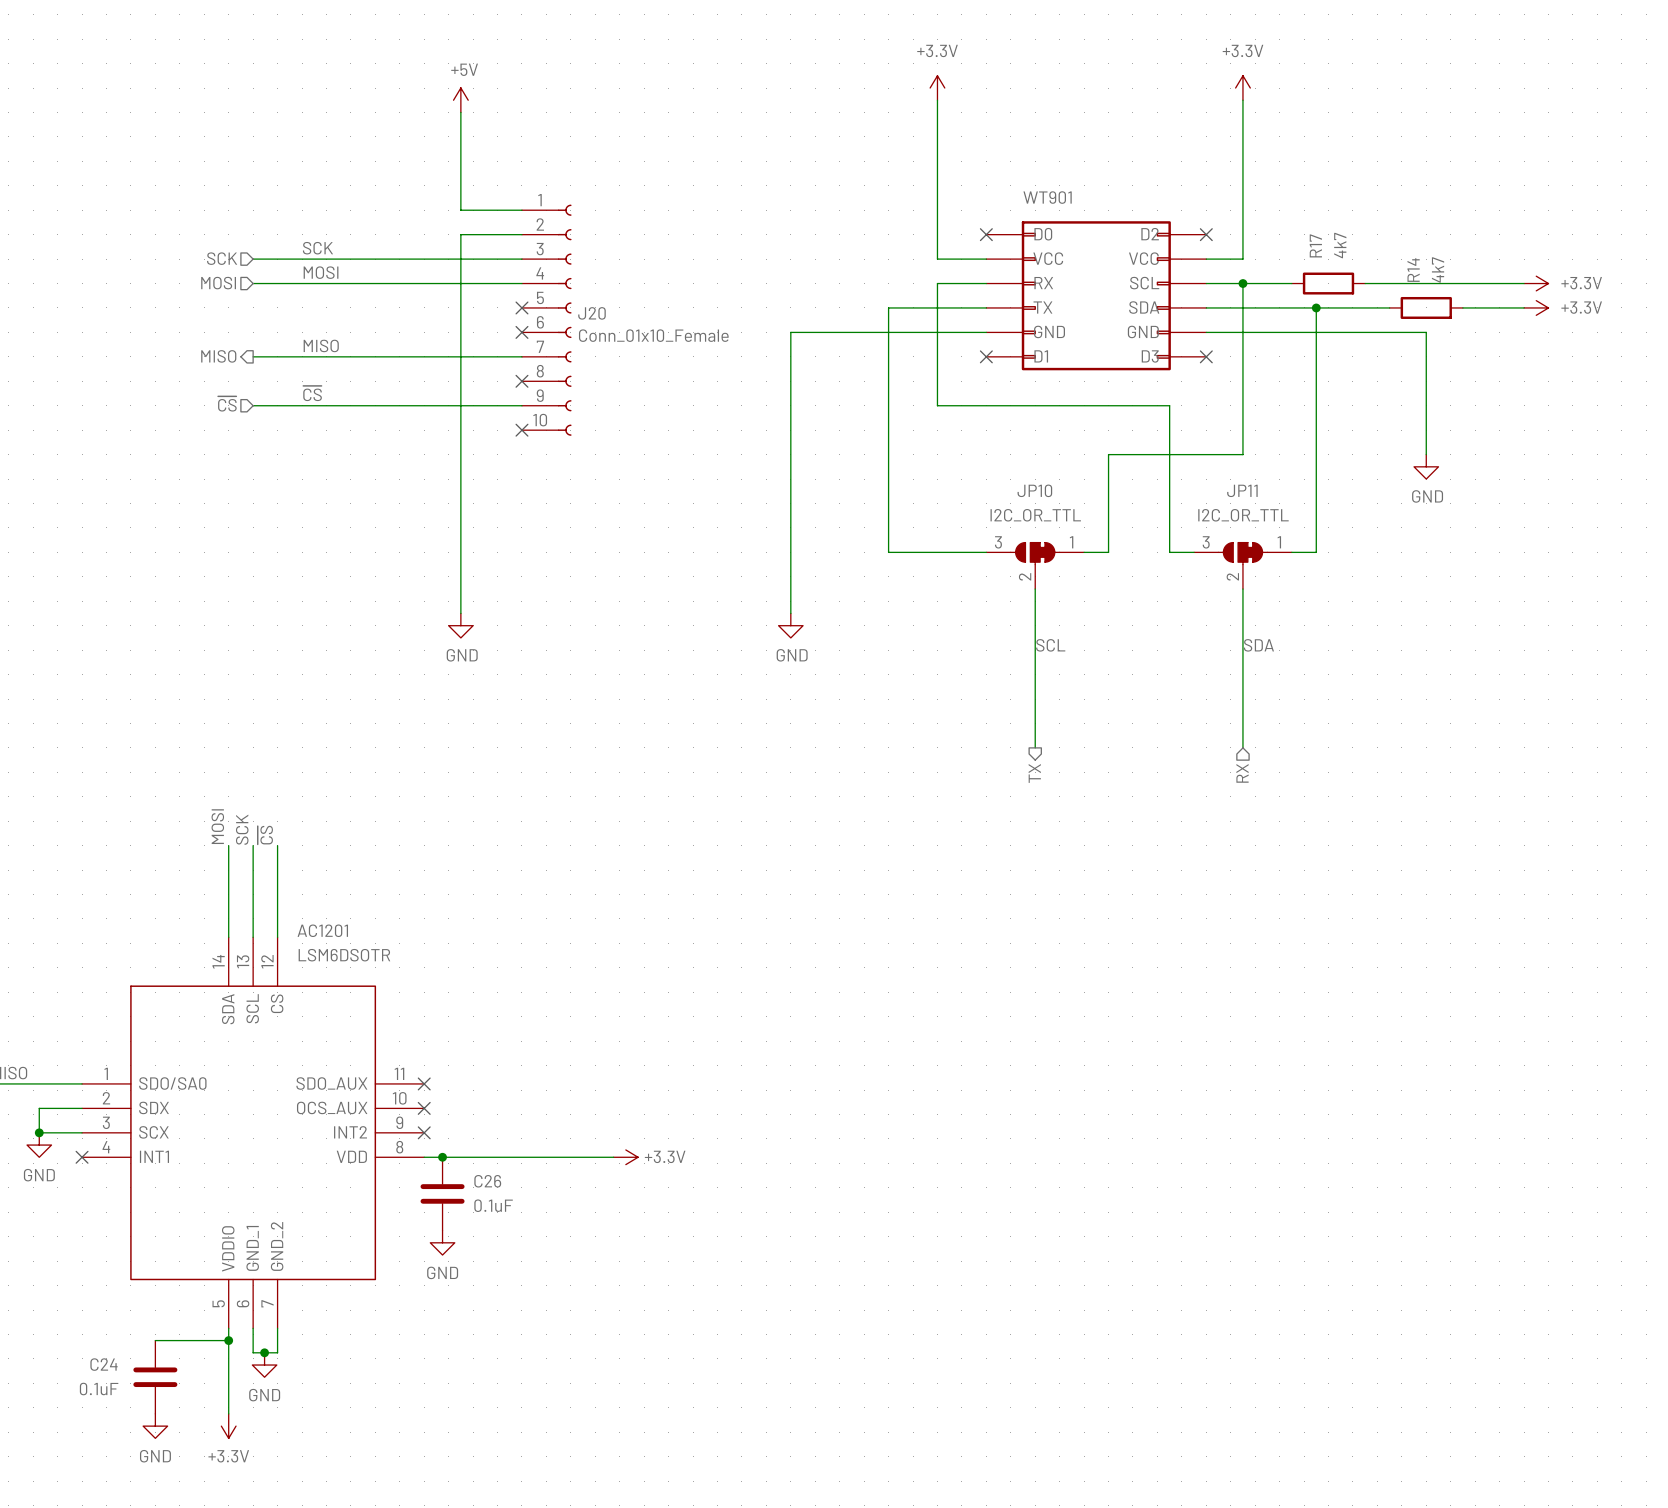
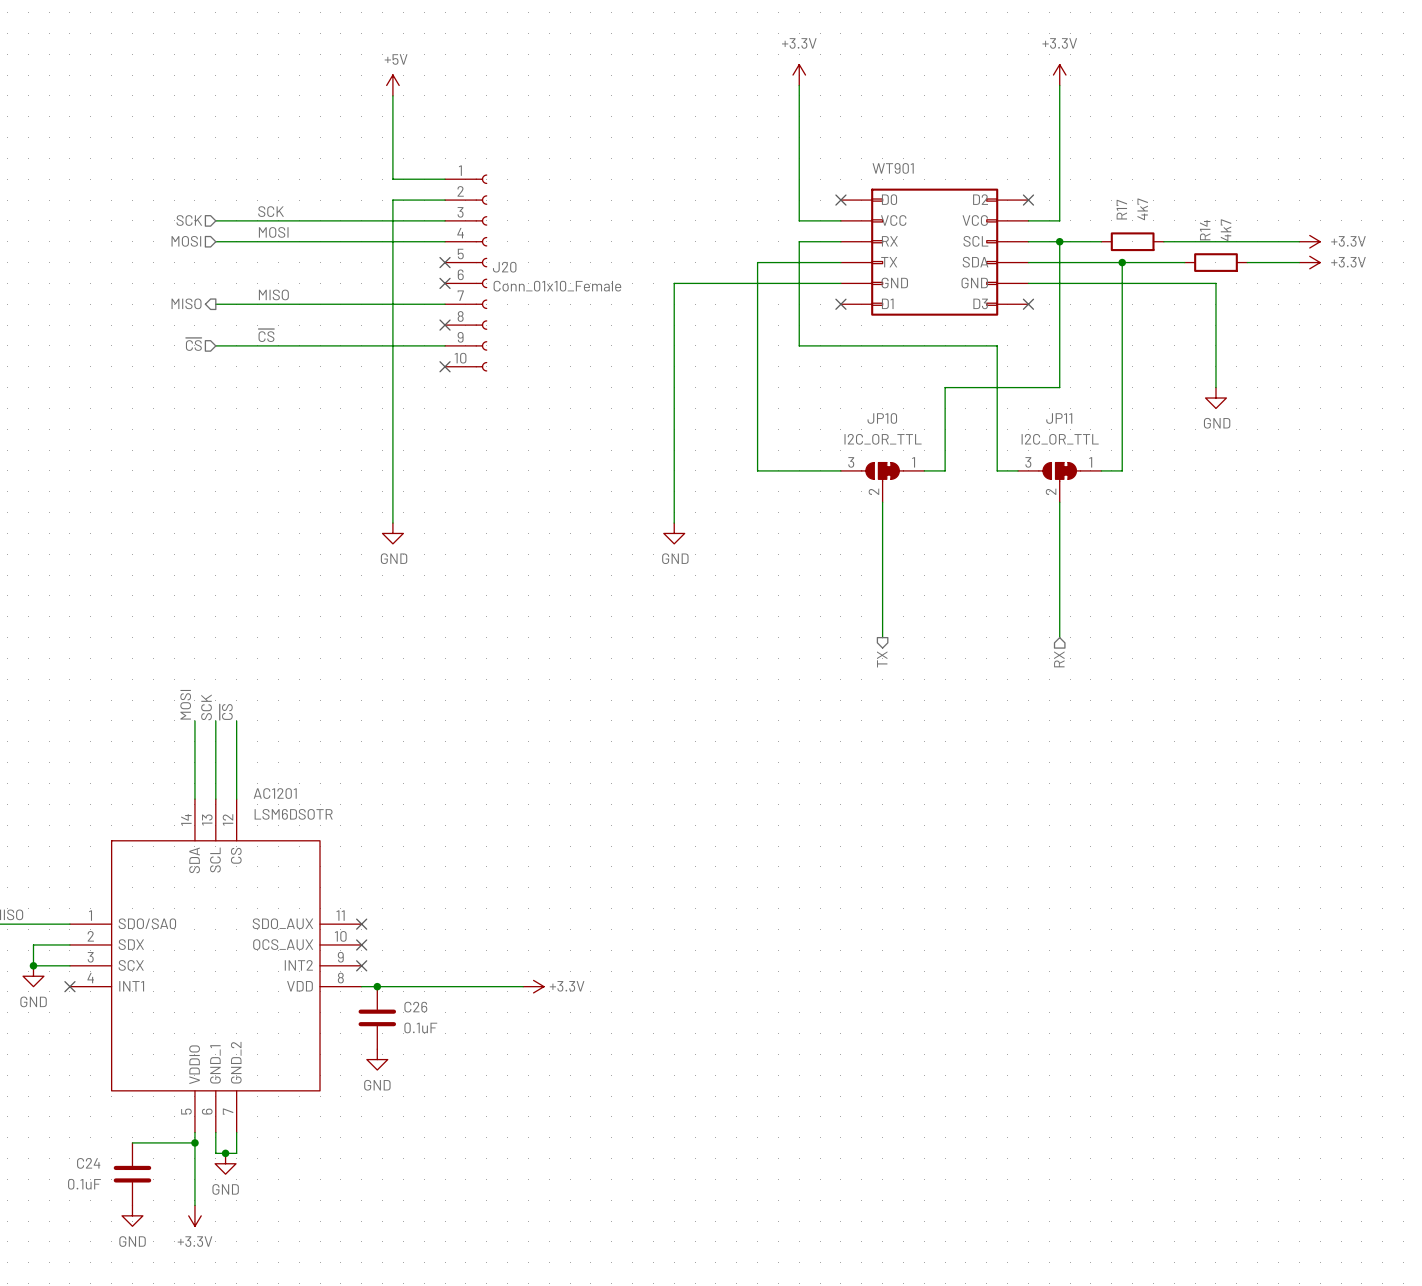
label: SCL (1050, 645) -> none
label: SDA (1258, 645) -> none

